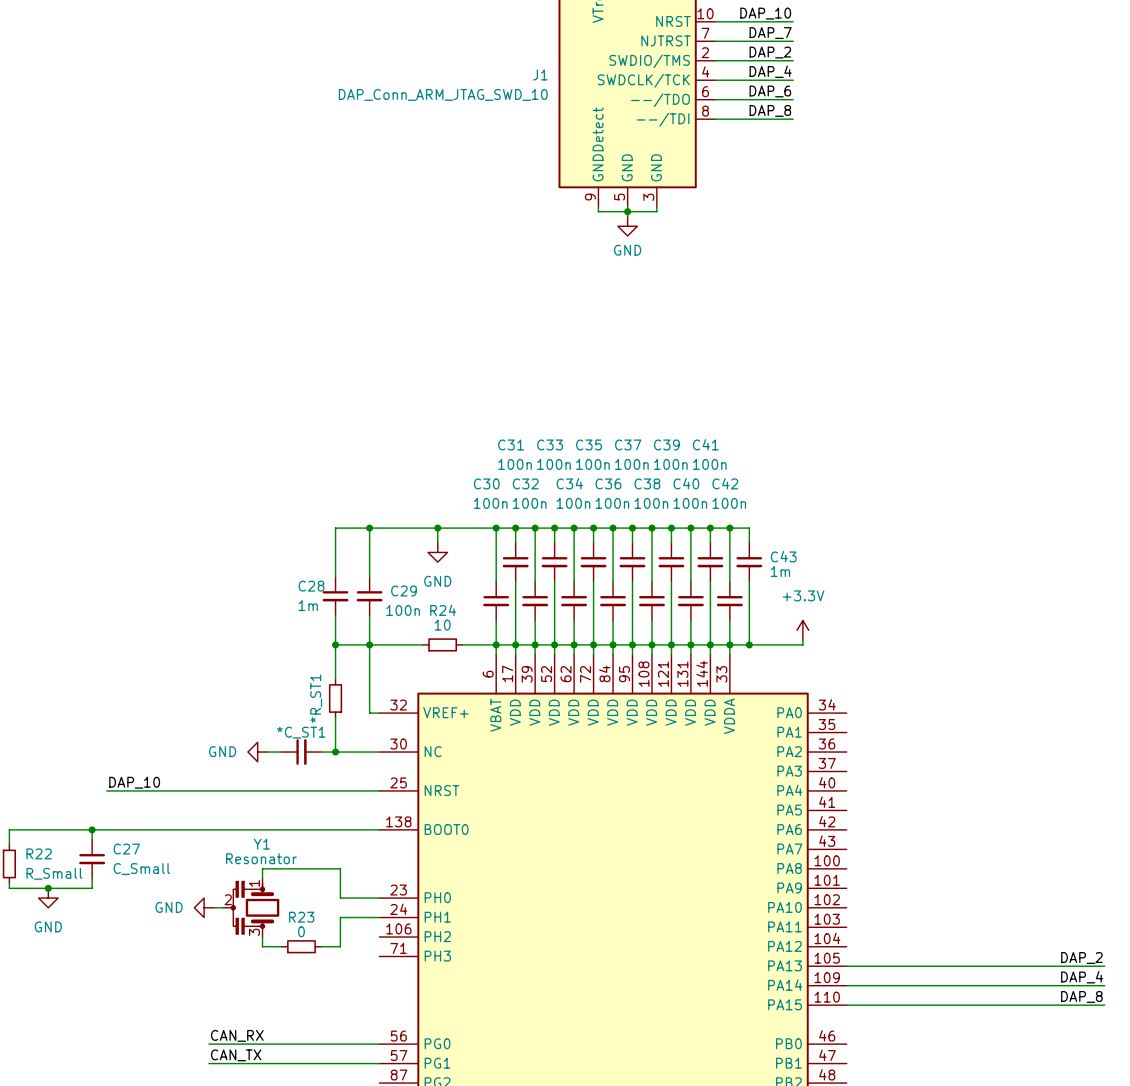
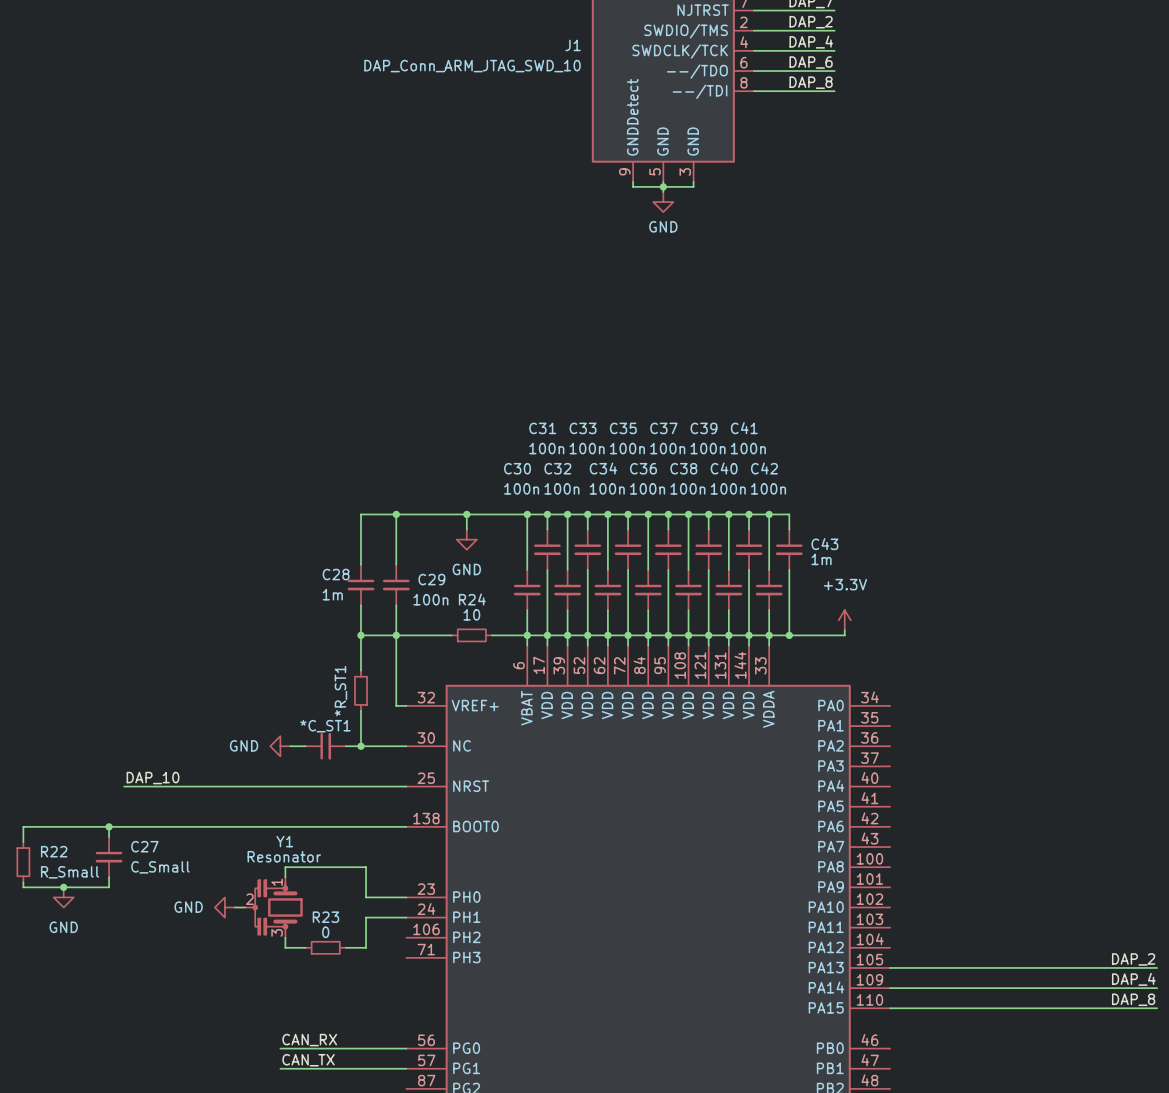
label position: CAN_RX (237, 1035) -> CAN_RX (309, 1040)
wire: (208, 1044) (257, 1044) -> none
label position: CAN_TX (236, 1055) -> CAN_TX (308, 1060)
wire: (208, 1063) (257, 1063) -> none

